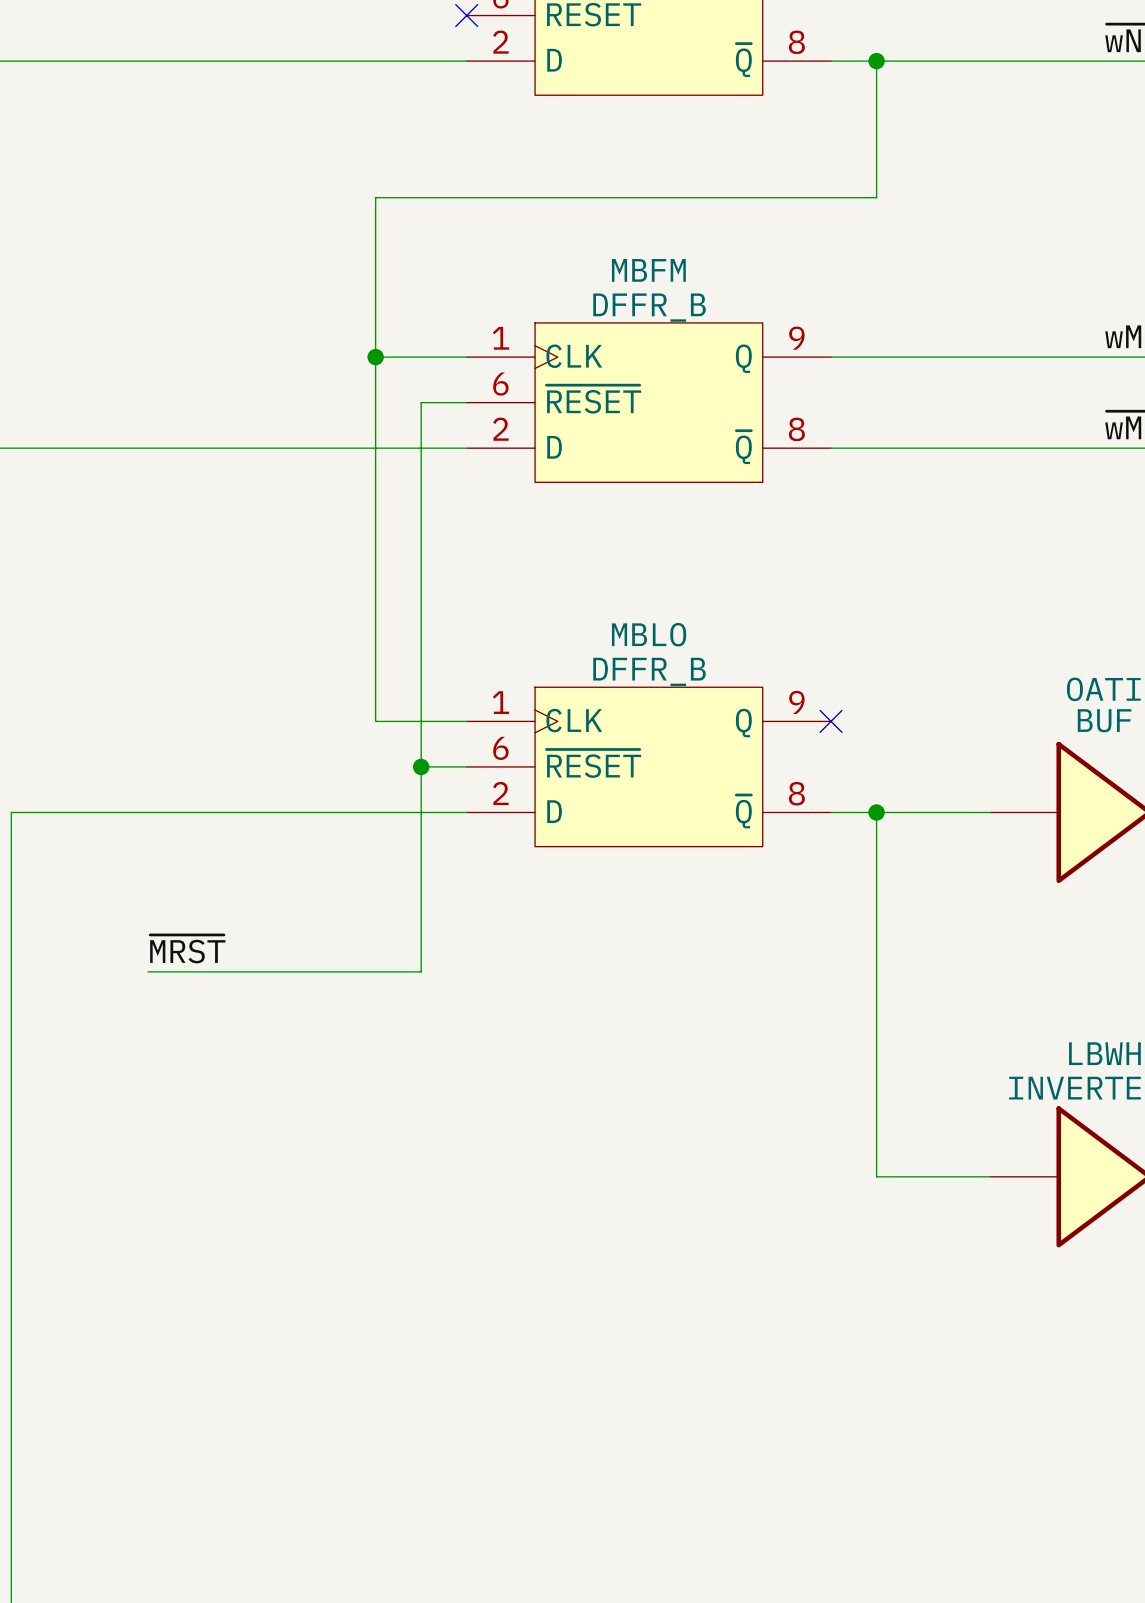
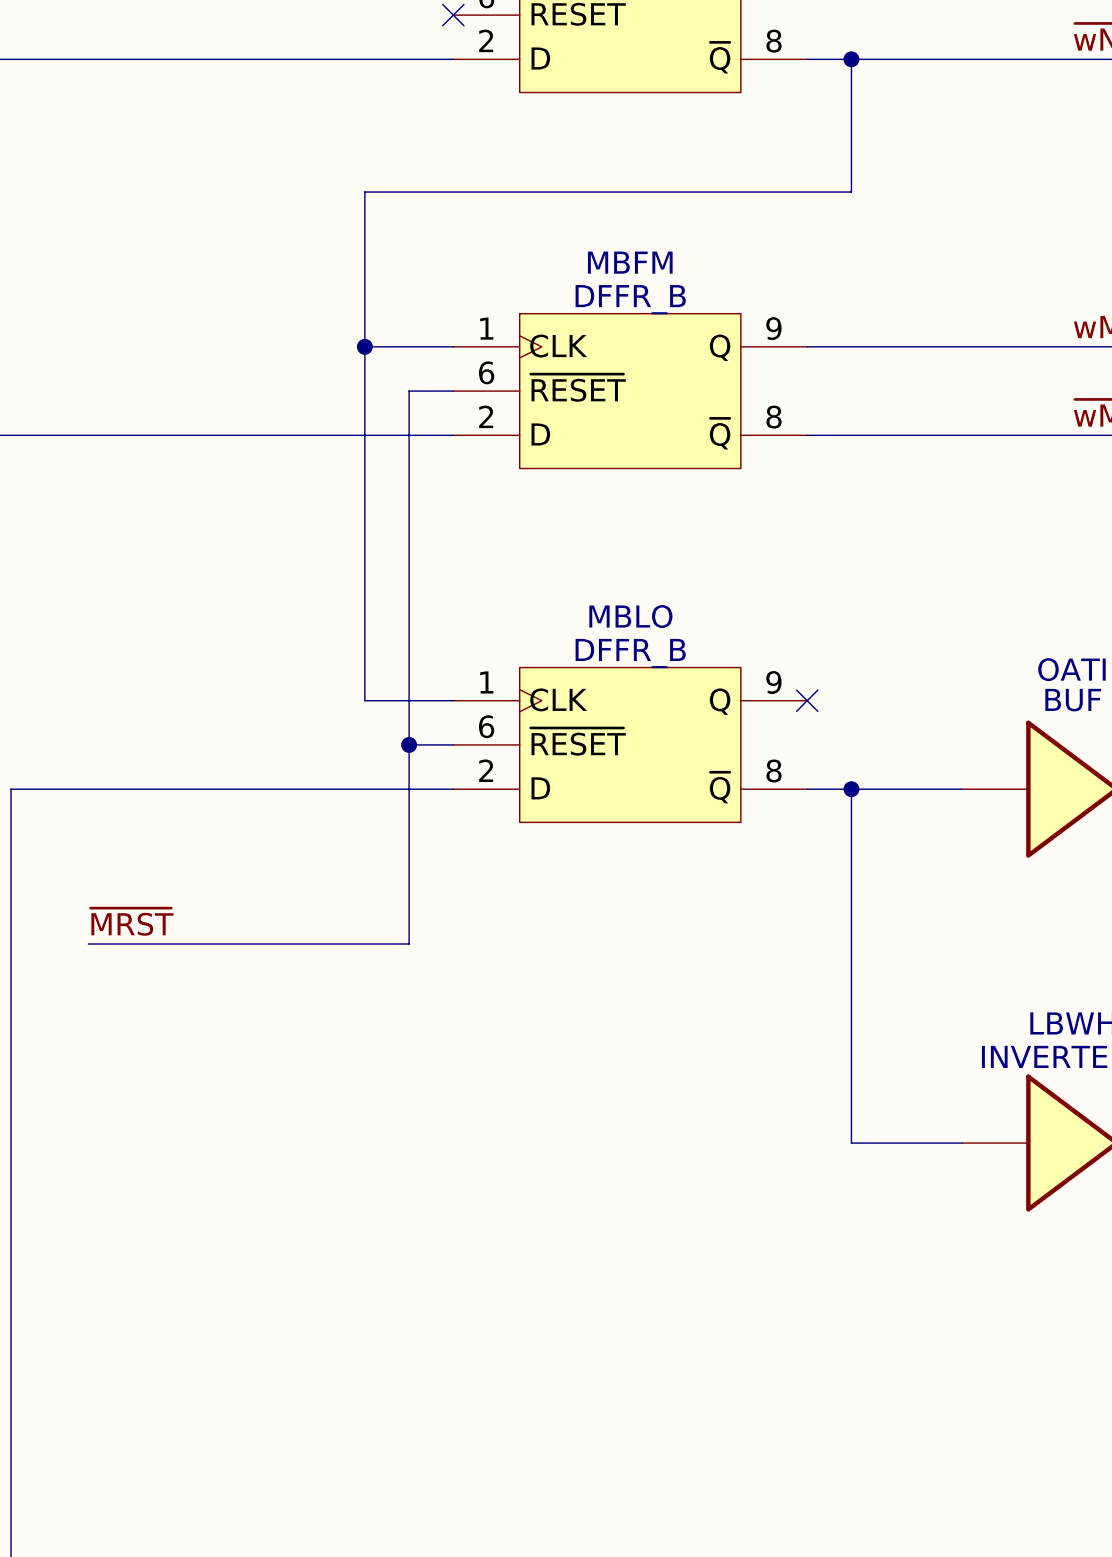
label position: ~{MRST} (187, 949) -> ~{MRST} (132, 921)
wire: none -> (88, 944) (143, 944)

